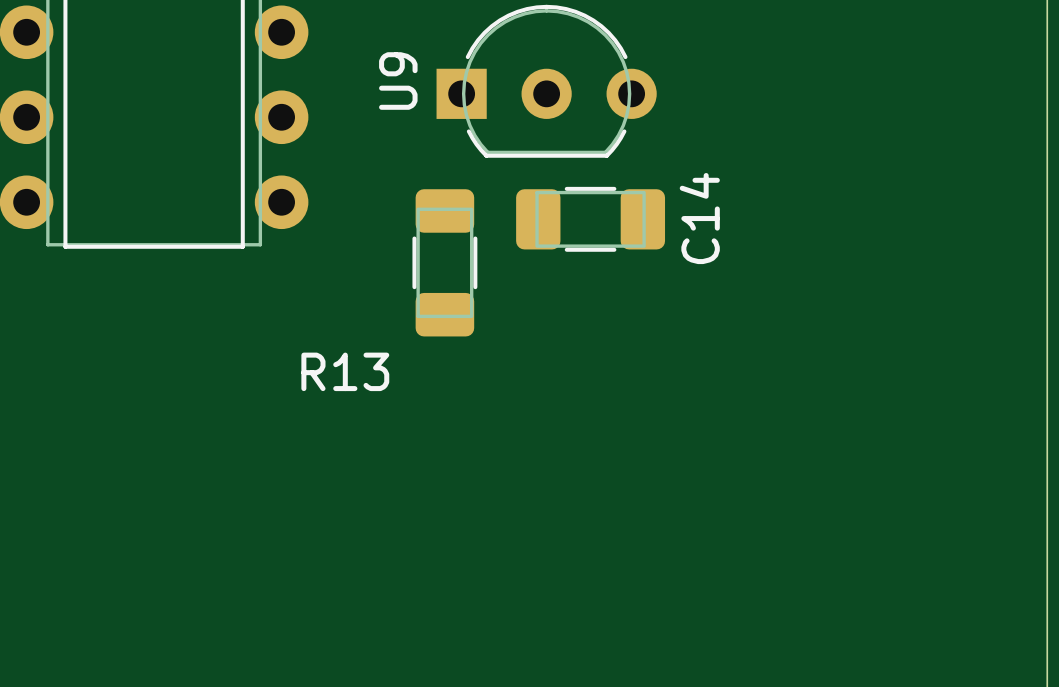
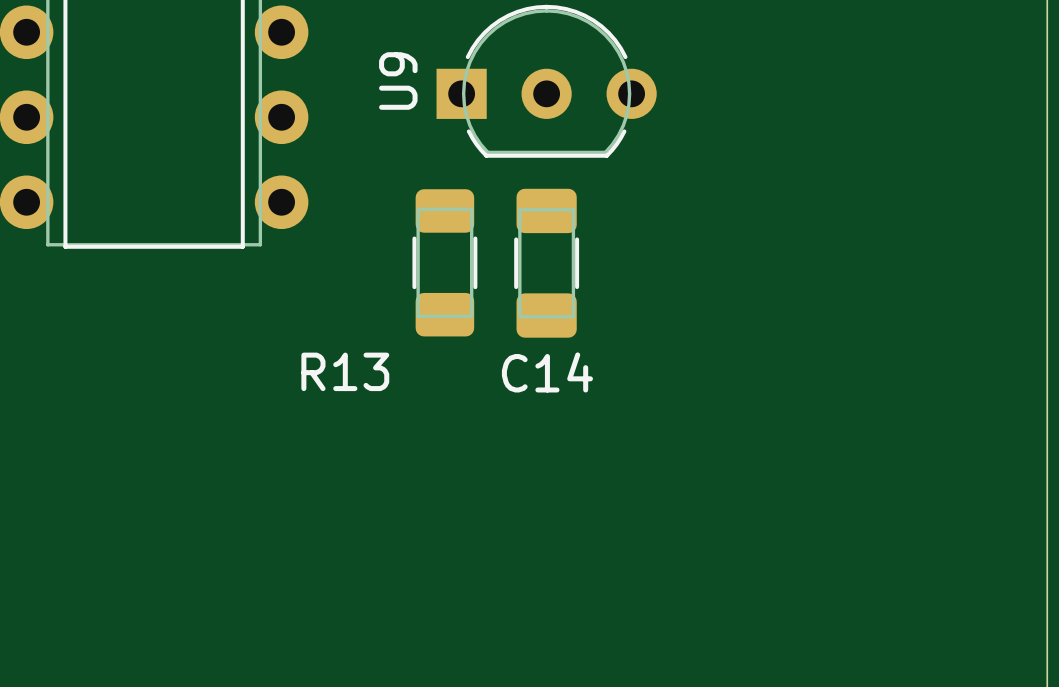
C14 rotation: 0° (590, 219) -> 90° clockwise (546, 263)

